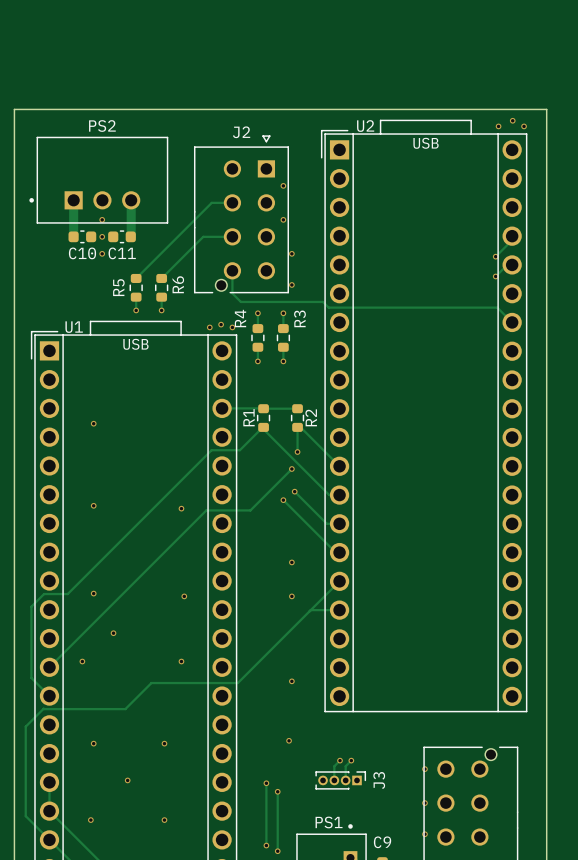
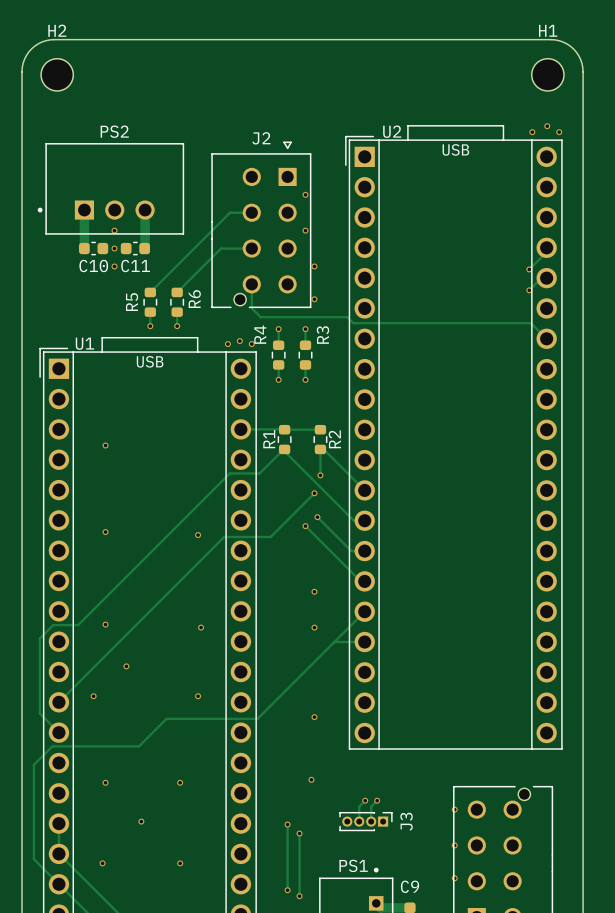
H2: none -> (57, 74)
H1: none -> (547, 74)
board edge: (14, 109) (546, 109) -> (21, 114) (21, 71) (24, 59) (28, 52) (38, 43) (54, 39) (555, 39) (570, 46) (580, 59) (583, 71) (583, 114)

